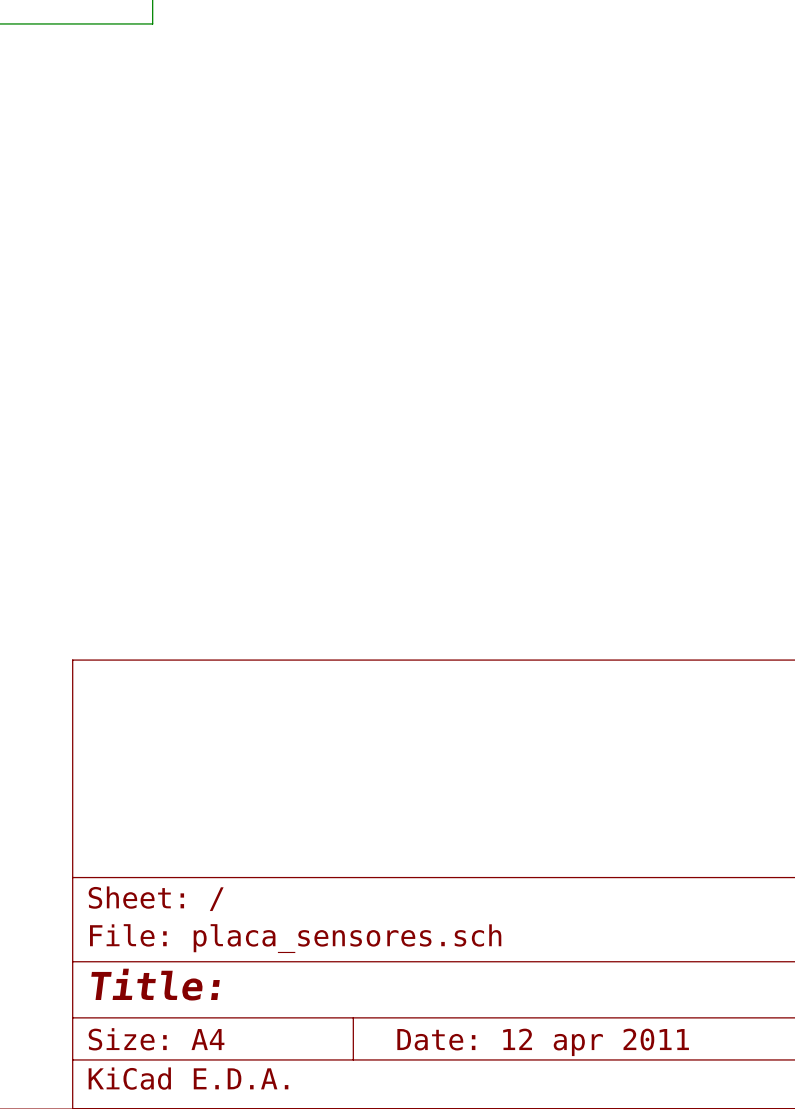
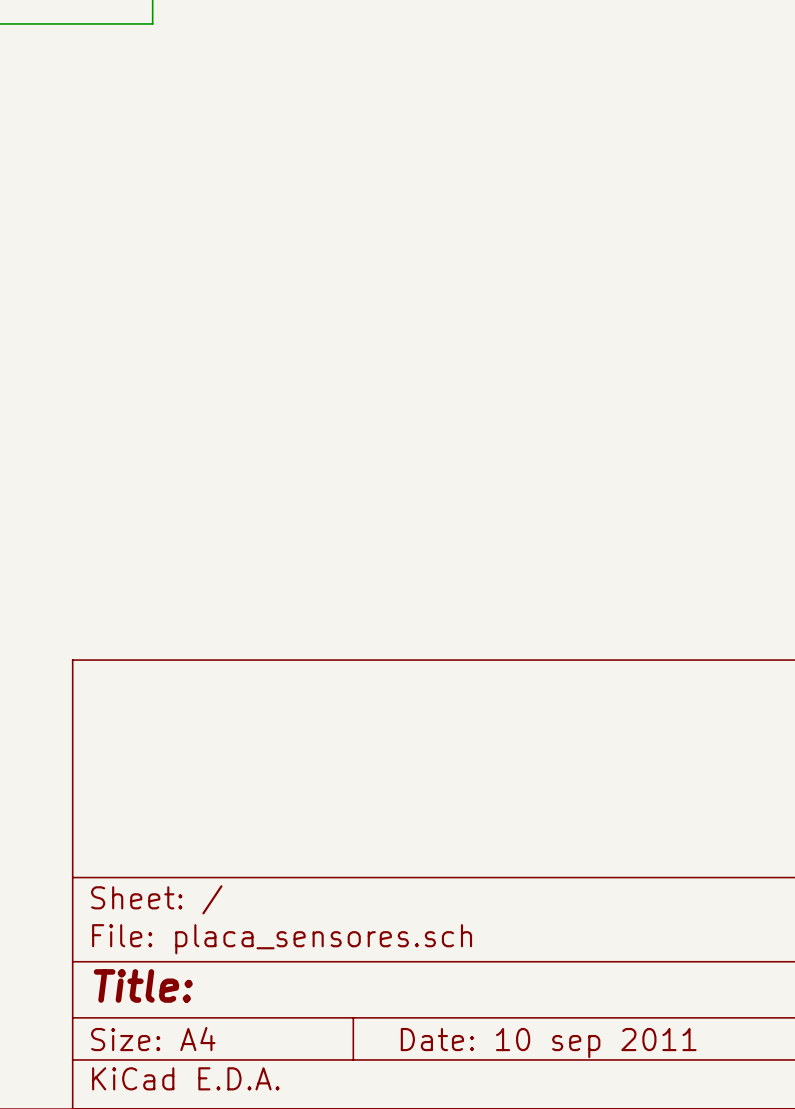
title block: Date: 12 apr 2011 (543, 1042) -> Date: 10 sep 2011 (548, 1043)

